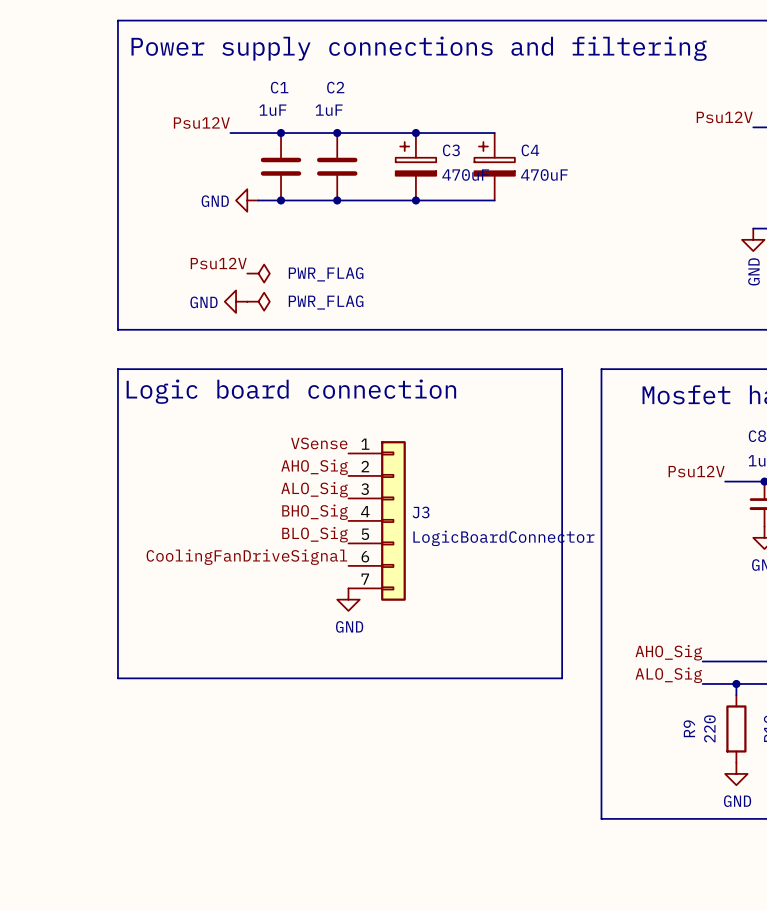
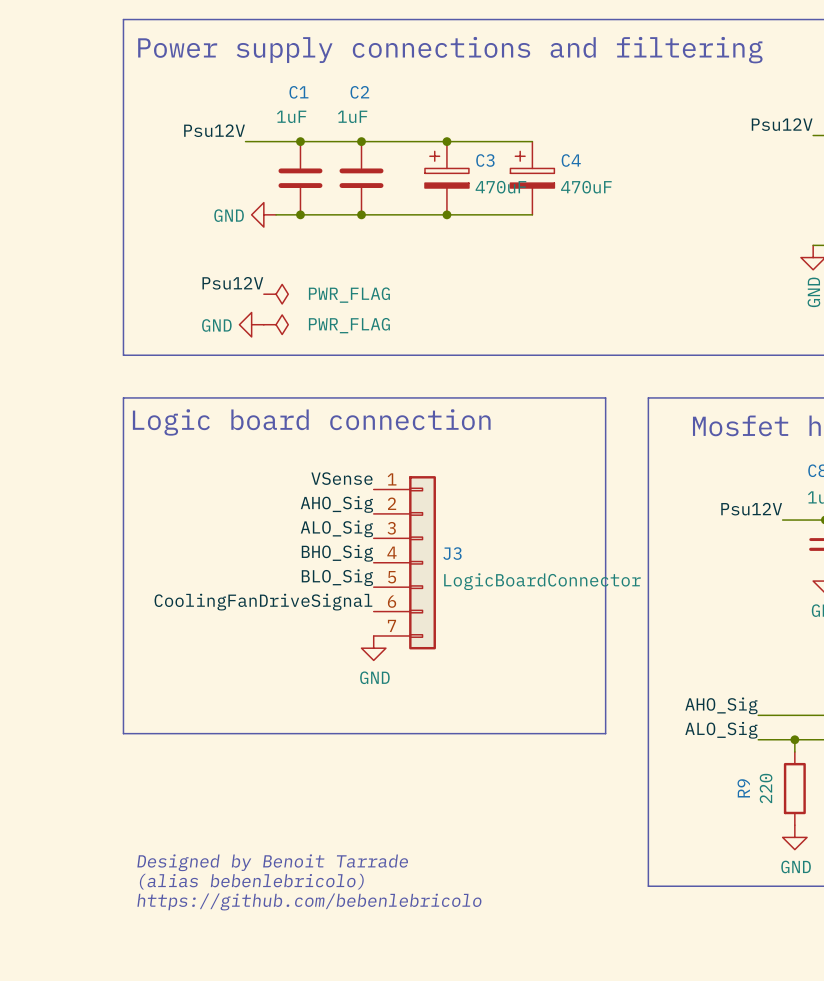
text: none -> Designed by Benoit Tarrade (272, 862)
text: none -> (alias bebenlebricolo) (251, 881)
text: none -> https://github.com/bebenlebricolo (309, 901)

